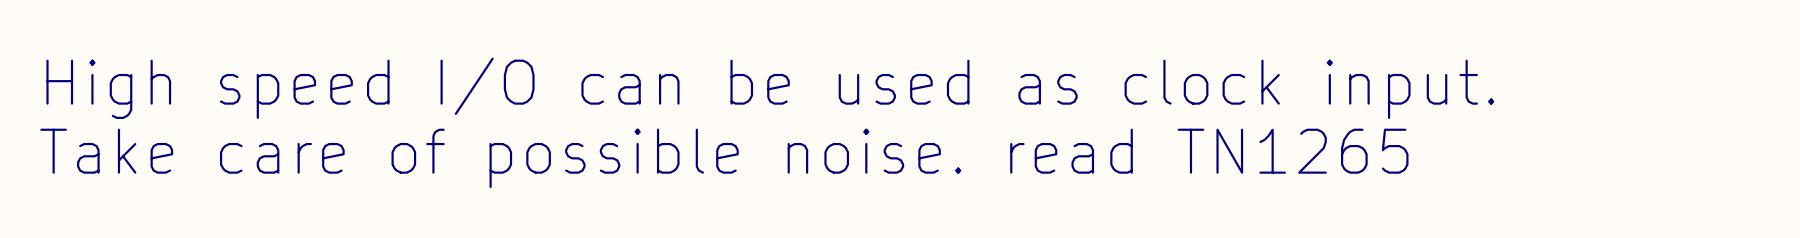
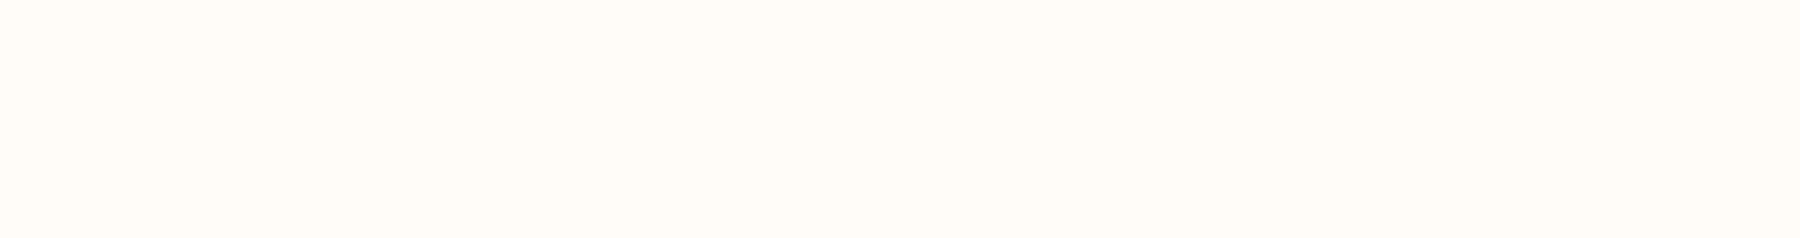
text: High speed I/O can be used as clock input. (770, 88) -> none
text: Take care of possible noise. read TN1265 (724, 158) -> none

